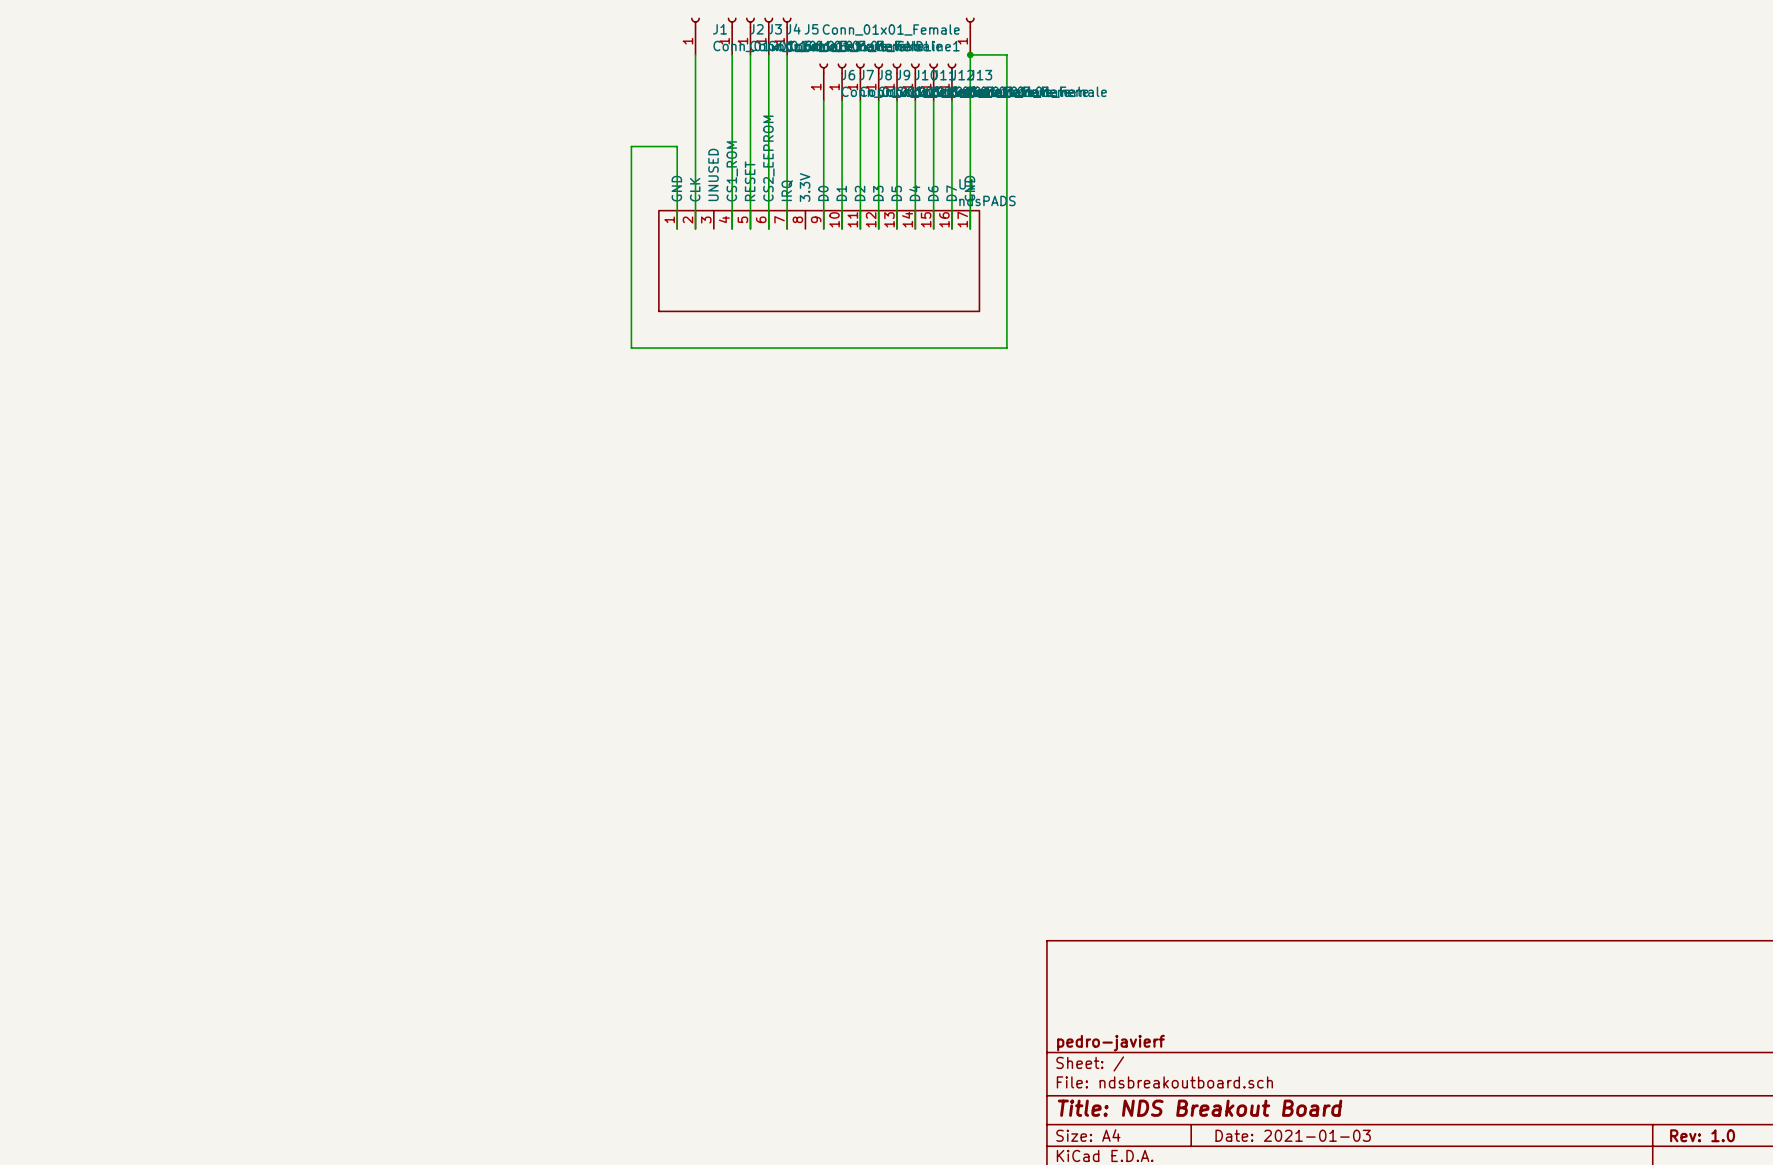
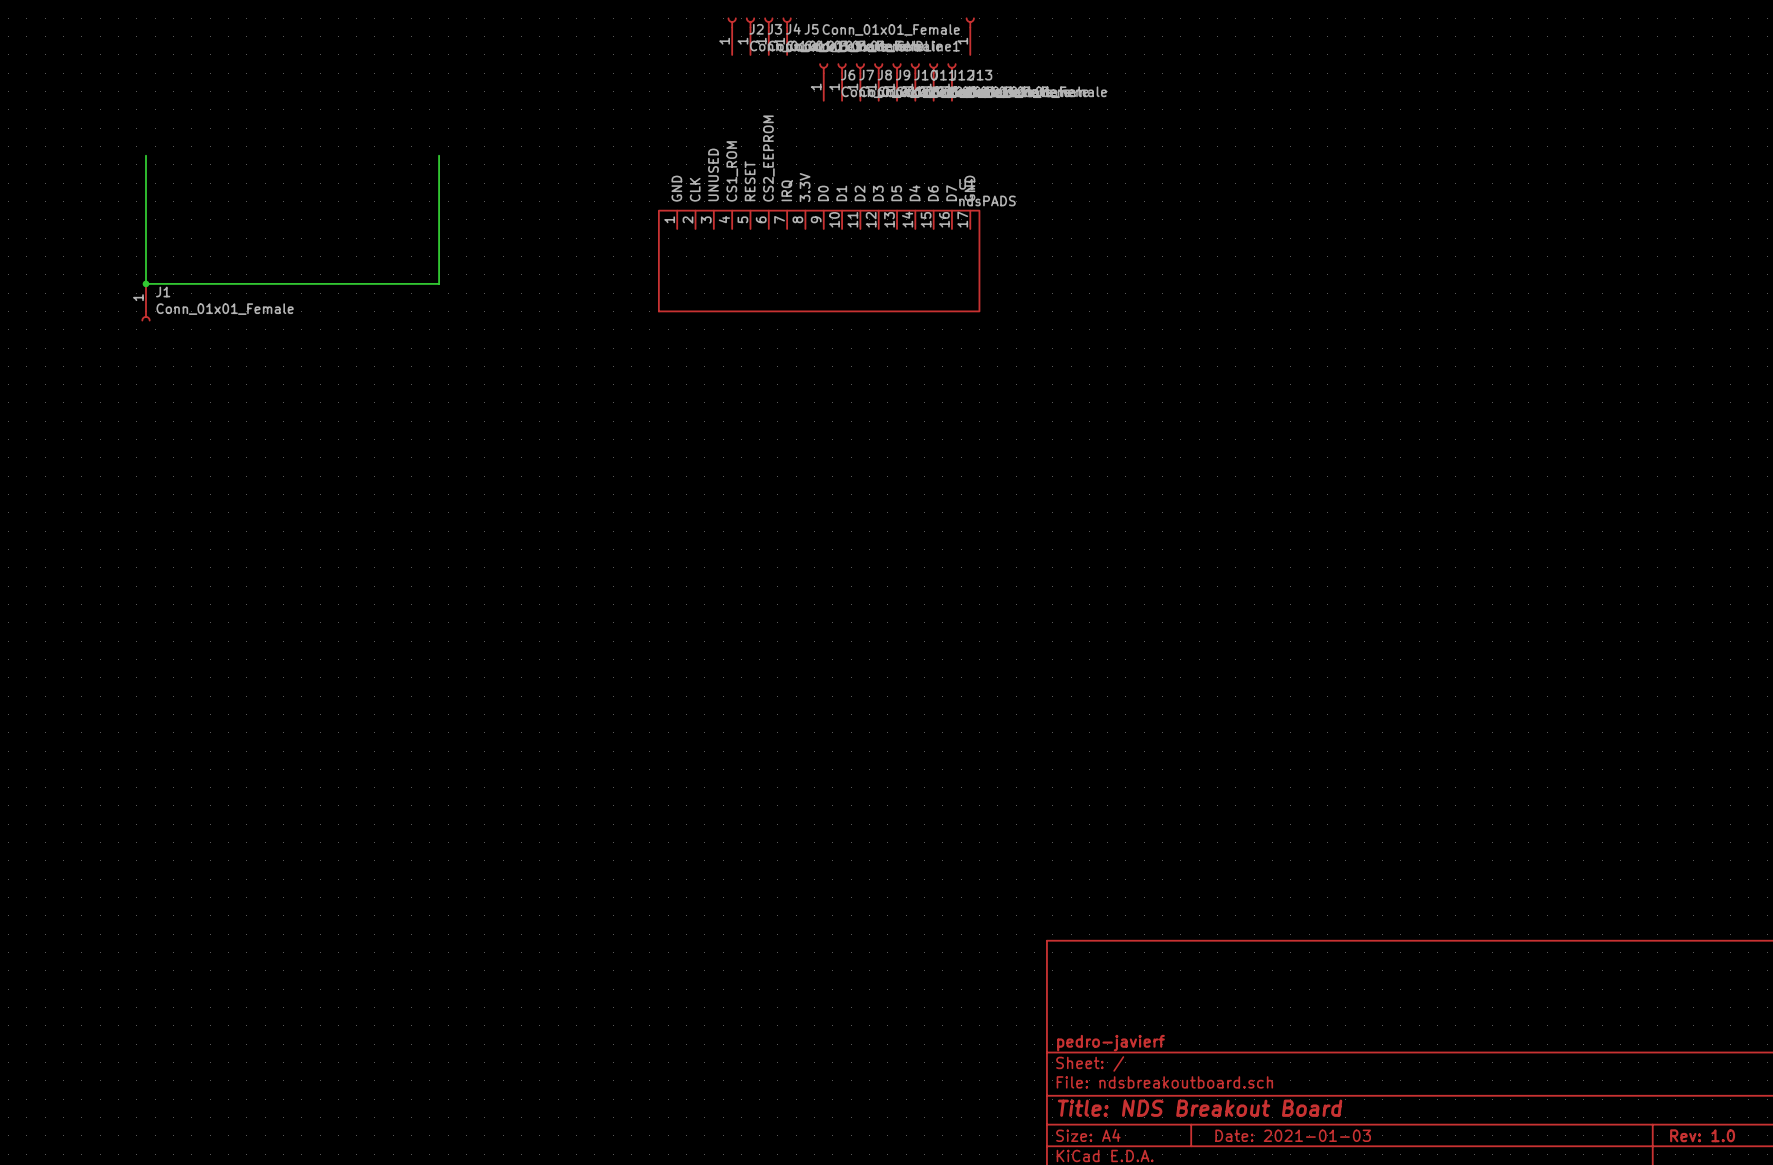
J1 rotation: 0° (695, 22) -> 180° (145, 315)
J1 position: (695, 36) -> (145, 302)
wire: (695, 54) (695, 228) -> none
wire: (732, 54) (732, 228) -> none
wire: (750, 54) (750, 228) -> none
wire: (768, 54) (768, 228) -> none
wire: (787, 54) (787, 228) -> none
junction: (970, 54) -> none
wire: (823, 100) (823, 228) -> none
wire: (842, 100) (842, 228) -> none
wire: (860, 100) (860, 228) -> none
wire: (878, 100) (878, 228) -> none
wire: (897, 100) (897, 228) -> none
wire: (915, 100) (915, 228) -> none
wire: (933, 100) (933, 228) -> none
wire: (951, 100) (951, 228) -> none
wire: none -> (145, 155) (145, 283) (439, 283) (439, 155)
wire: (677, 228) (677, 146) (631, 146) (631, 348) (1006, 348) (1006, 54) (970, 54) (970, 228) -> none
junction: none -> (145, 283)

